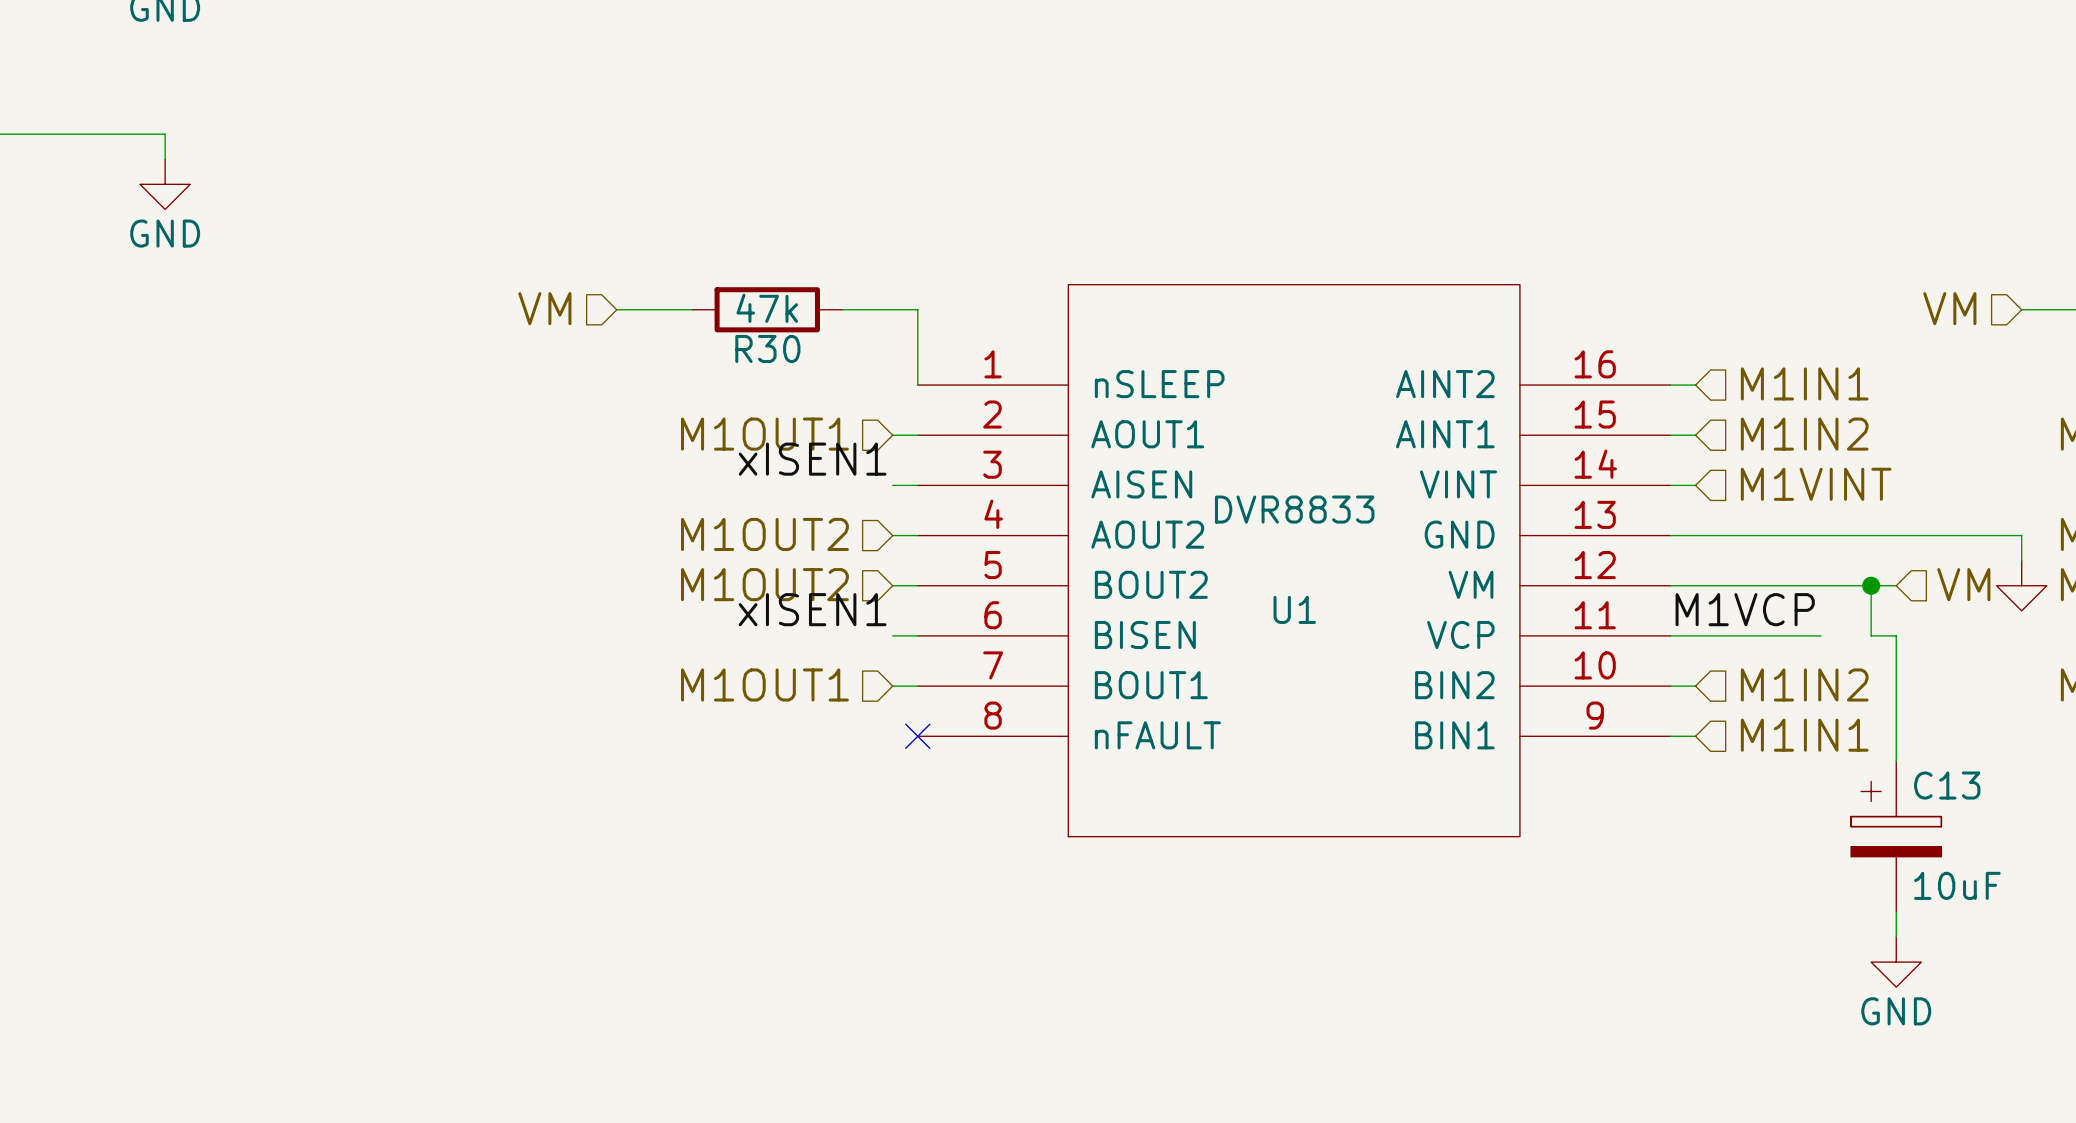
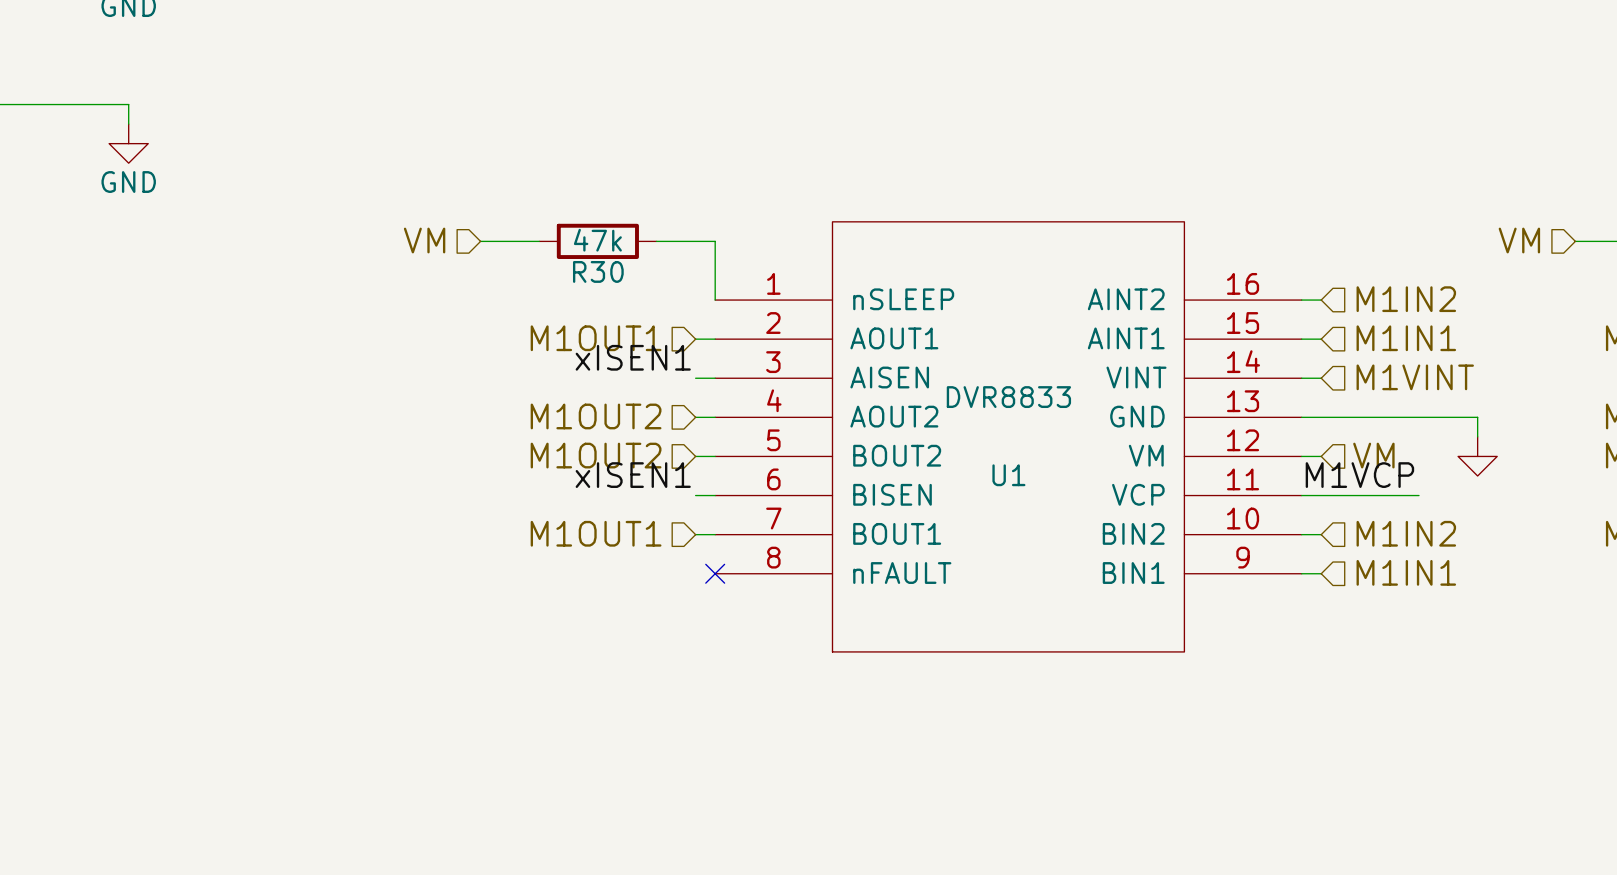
hierarchical label: M1IN1 (1804, 383) -> M1IN2 (1406, 299)
hierarchical label: M1IN2 (1804, 434) -> M1IN1 (1406, 338)
wire: (1896, 535) (2021, 535) (2021, 560) -> (1477, 417) (1477, 436)
hierarchical label position: VM (1963, 584) -> VM (1373, 455)
wire: (1695, 585) (1896, 585) -> none
wire: (1871, 585) (1871, 635) (1896, 635) (1896, 761) -> none
junction: (1871, 585) -> none
power symbol position: (2021, 585) -> (1477, 456)
C13: 10uF (1896, 836) -> none
wire: (1896, 911) (1896, 936) -> none
power symbol: GND (1896, 962) -> none

